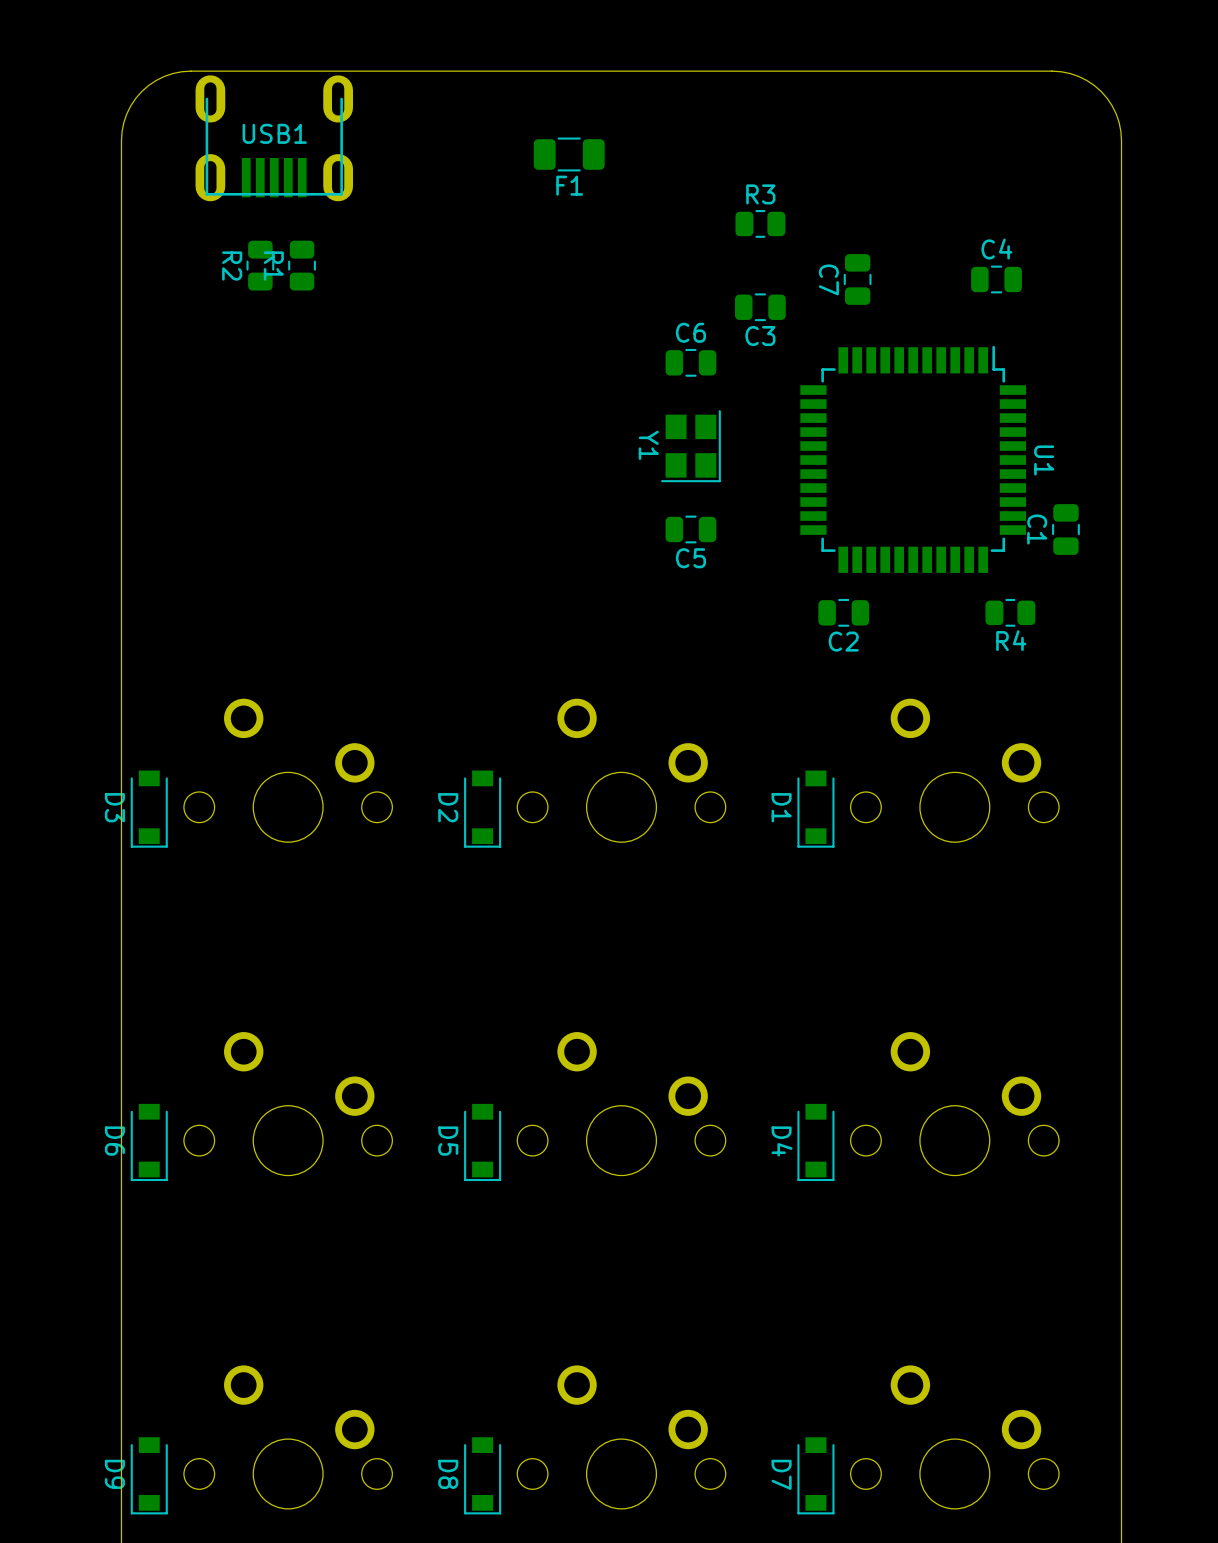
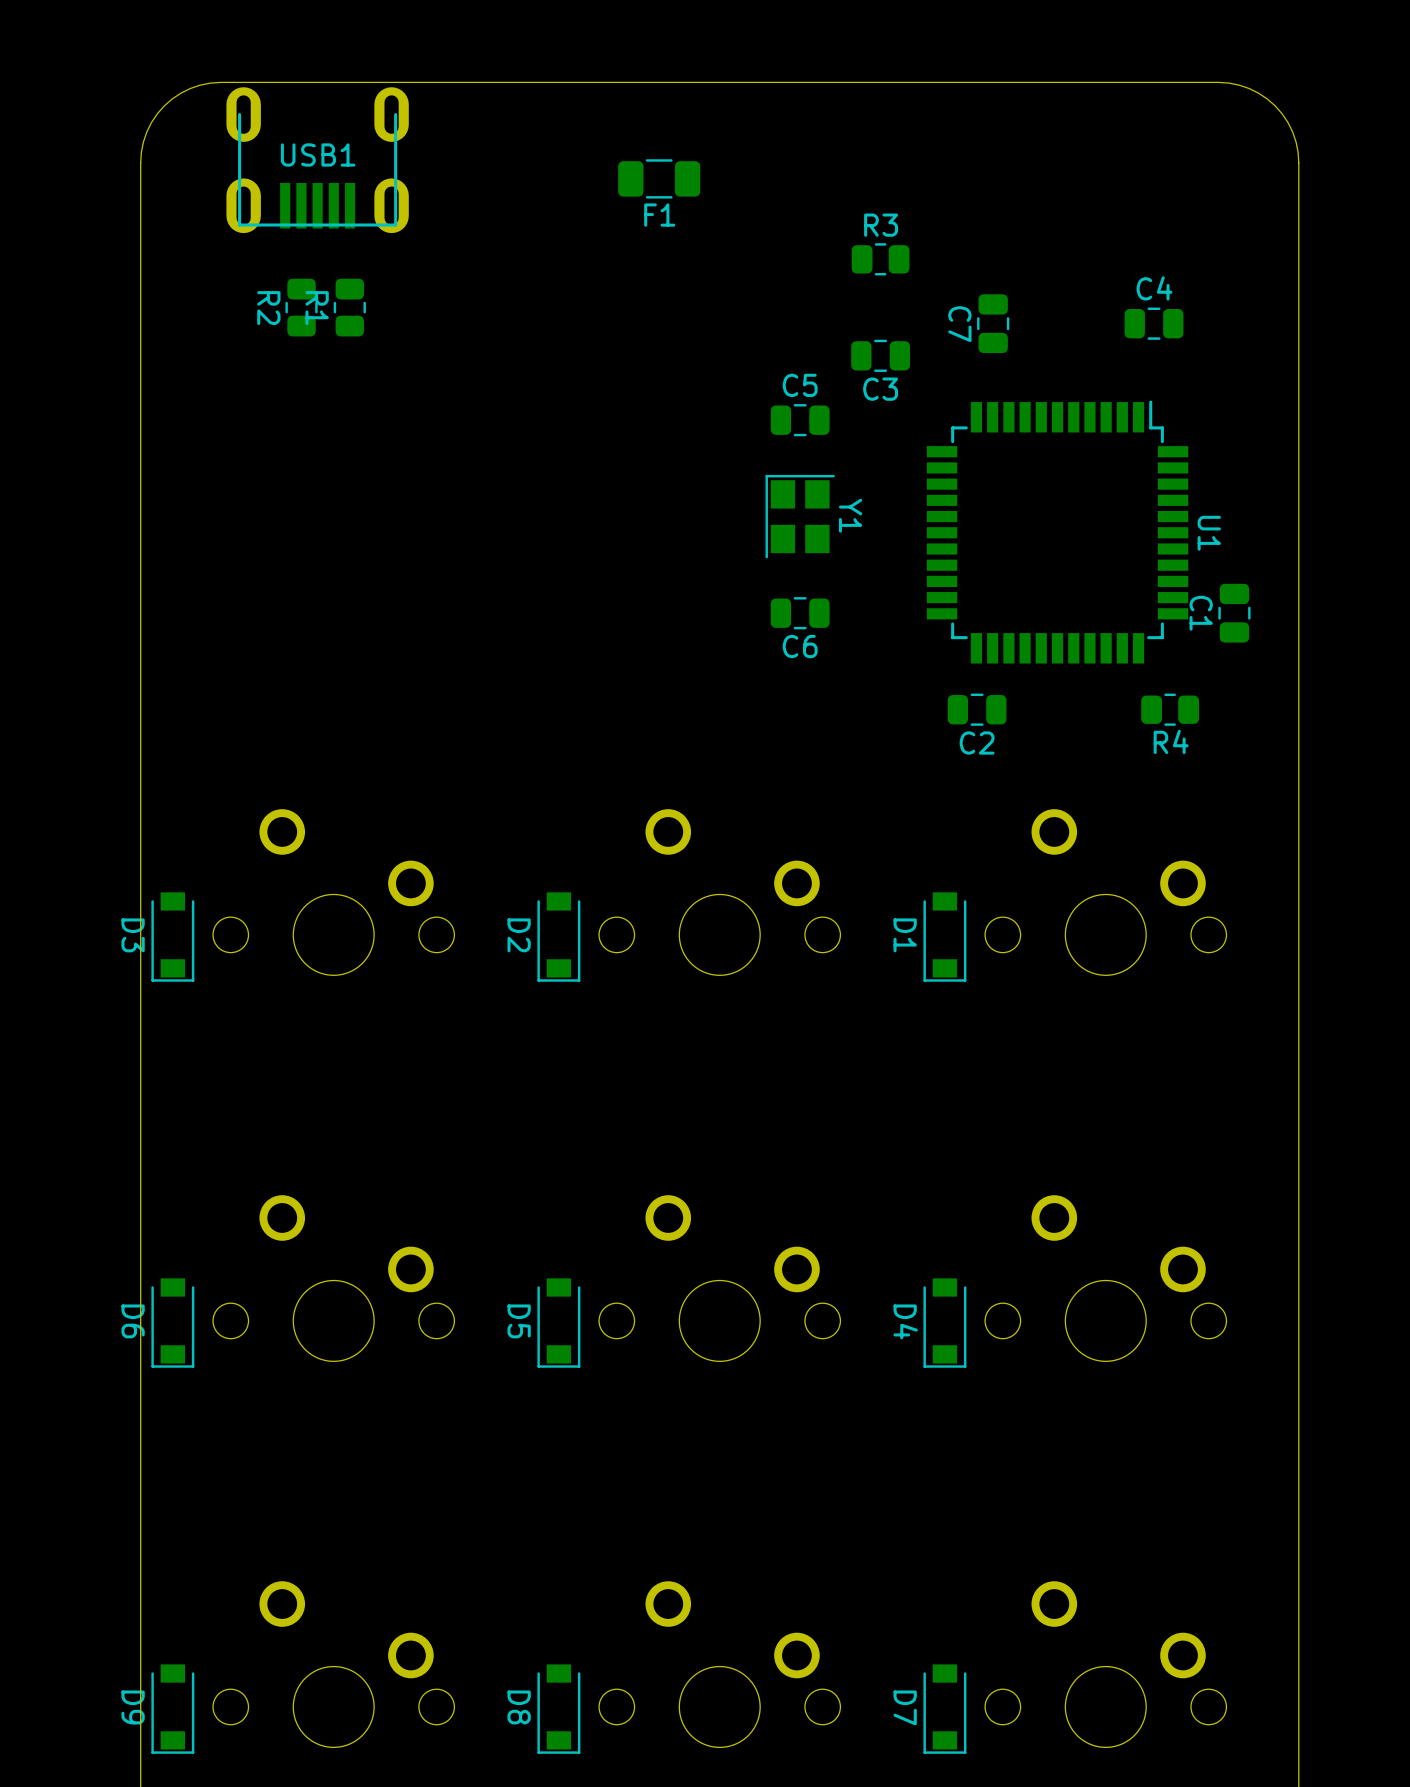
C6 name: C6 (690, 332) -> C5 (800, 385)
Y1 rotation: 0° (690, 446) -> 180° (800, 516)
C5 name: C5 (690, 558) -> C6 (800, 646)

